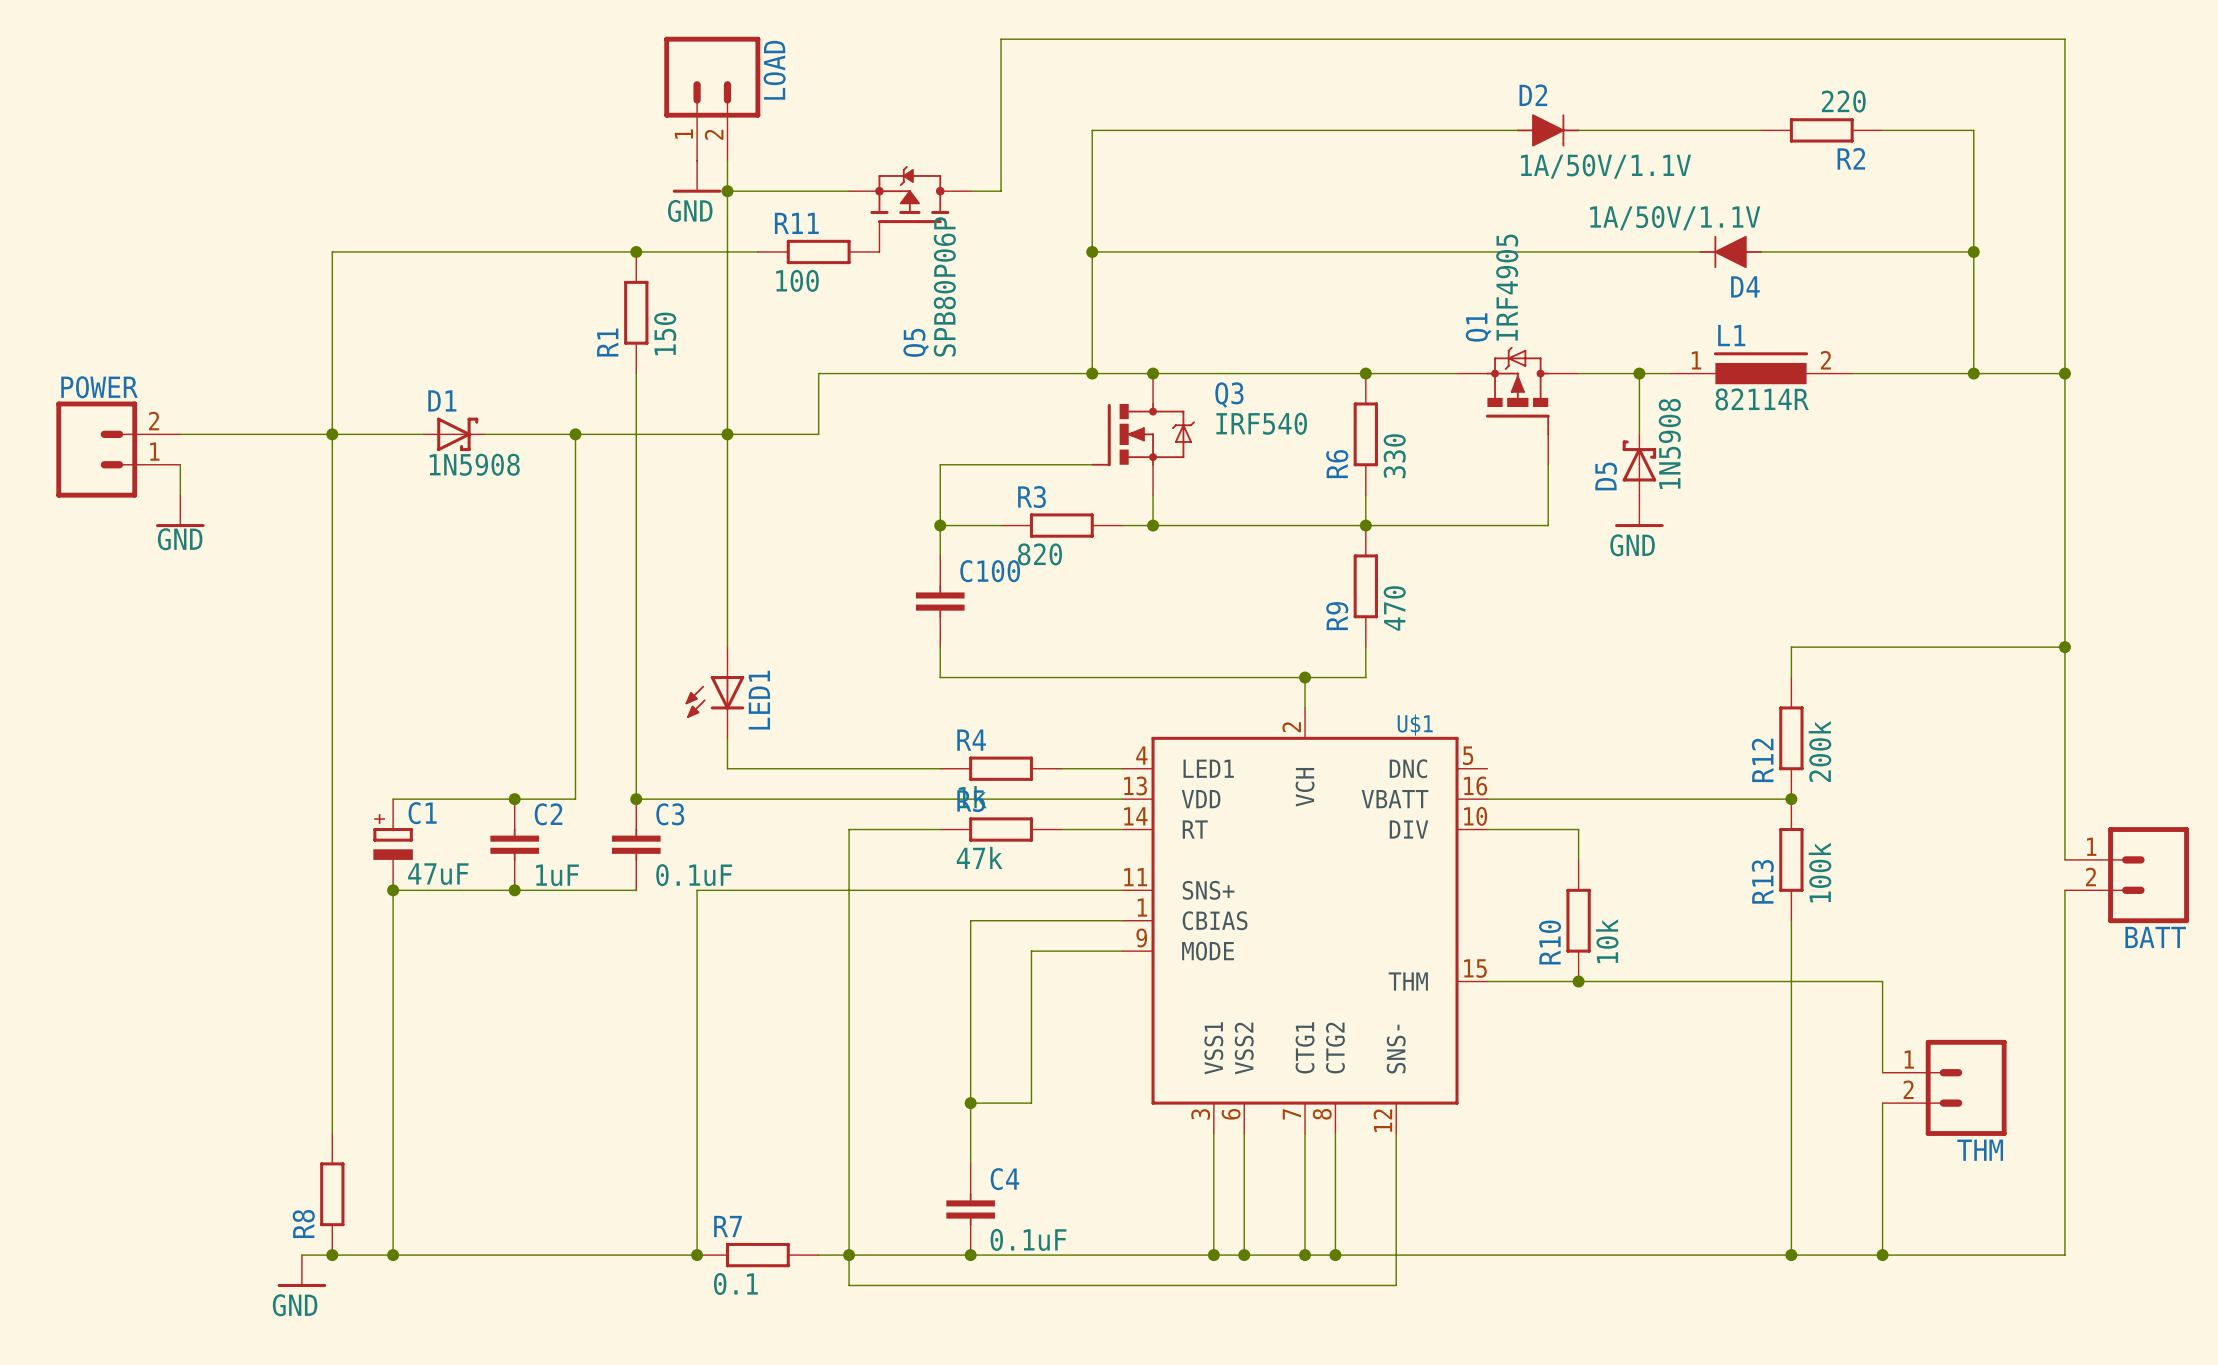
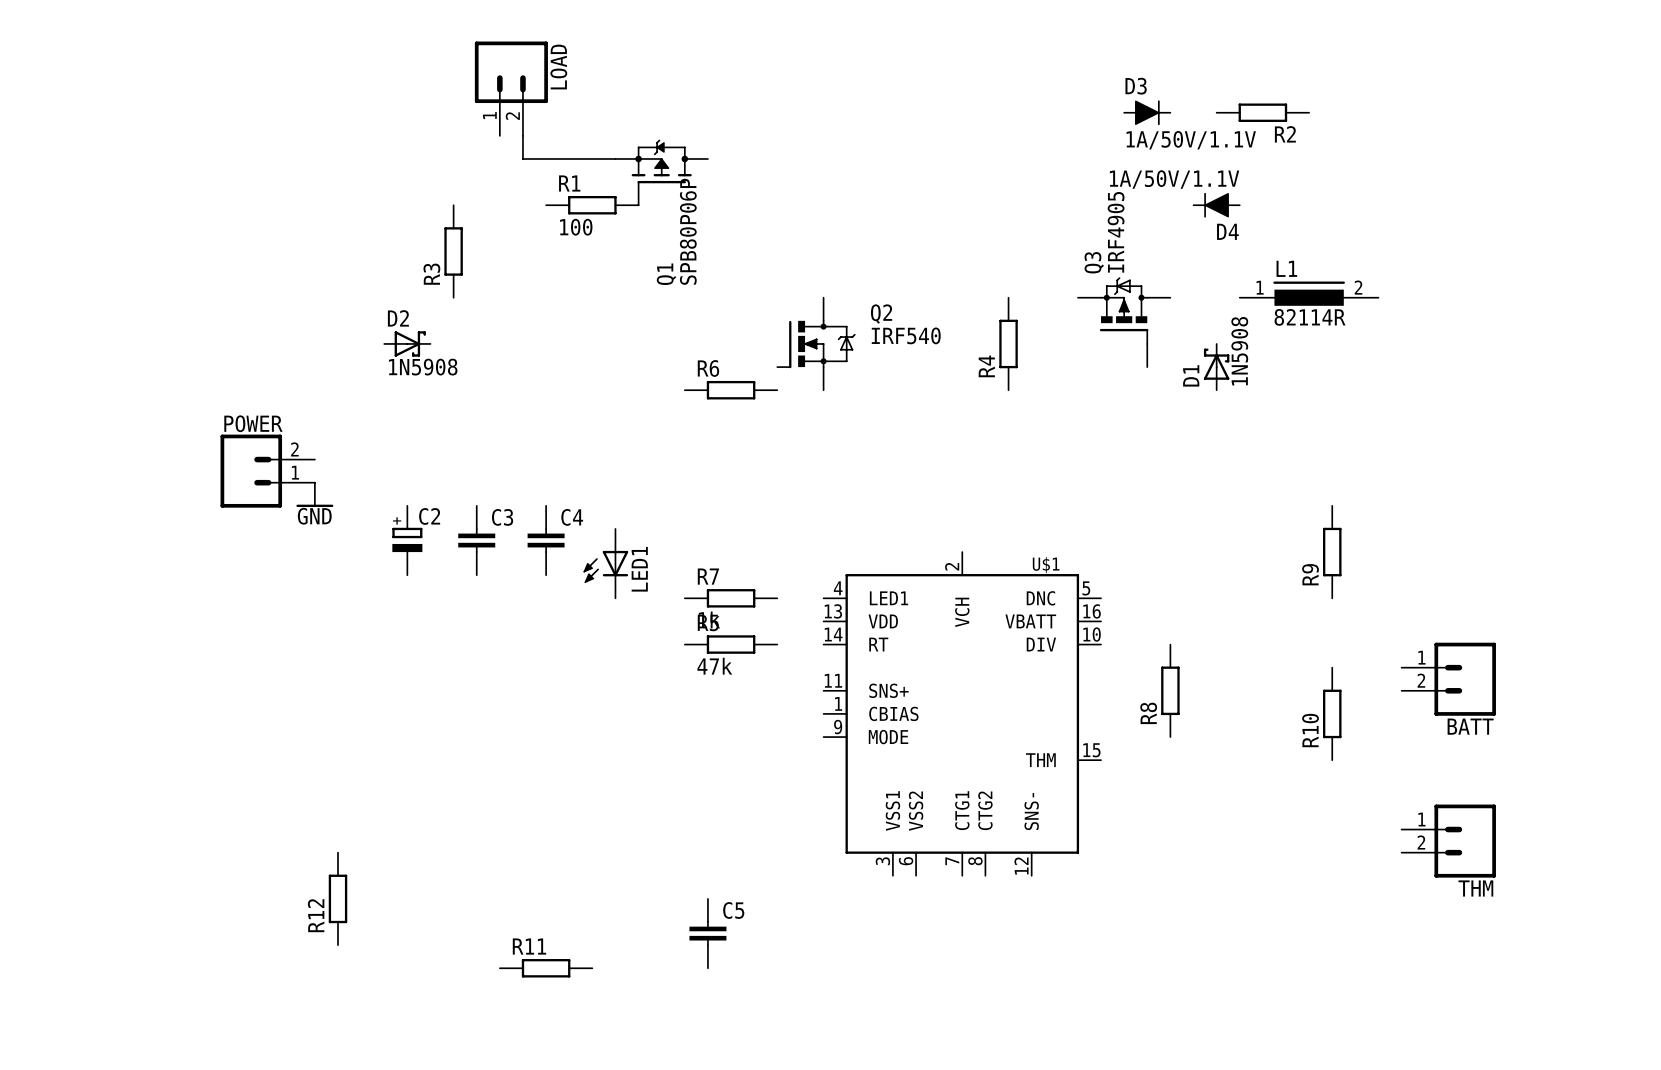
D2 name: D2 (1533, 95) -> D3 (1136, 86)
R2 value: 220 (1843, 101) -> none
wire: (1517, 130) (1092, 130) (1092, 373) -> none
wire: (1578, 130) (1760, 130) -> none
R2 position: (1821, 130) -> (1262, 112)
wire: (1882, 130) (1973, 130) (1973, 373) -> none
power symbol: GND (697, 176) -> none
wire: (727, 191) (727, 647) -> none
junction: (727, 191) -> none
wire: (970, 191) (1001, 191) (1001, 39) (2064, 39) (2064, 859) -> none
R11 name: R11 (796, 223) -> R1 (569, 183)
junction: (636, 251) -> none
wire: (757, 251) (332, 251) (332, 1133) -> none
wire: (1092, 251) (1700, 251) -> none
junction: (1092, 251) -> none
D4 position: (1730, 251) -> (1216, 205)
wire: (1760, 251) (1973, 251) -> none
junction: (1973, 251) -> none
Q1 name: Q1 (1478, 327) -> Q3 (1094, 262)
R1 value: 150 (665, 333) -> none
R1 name: R1 (607, 342) -> R3 (431, 274)
Q5 name: Q5 (916, 342) -> Q1 (666, 274)
wire: (636, 373) (636, 799) (1122, 799) -> none
junction: (1092, 373) -> none
junction: (1153, 373) -> none
junction: (1365, 373) -> none
wire: (1457, 373) (818, 373) (818, 434) (484, 434) -> none
wire: (1578, 373) (1669, 373) -> none
wire: (1639, 373) (1639, 434) -> none
junction: (1639, 373) -> none
wire: (1852, 373) (2064, 373) -> none
junction: (1973, 373) -> none
junction: (2064, 373) -> none
wire: (180, 434) (423, 434) -> none
junction: (332, 434) -> none
D1: 1N5908 (453, 434) -> none
wire: (575, 434) (575, 799) (393, 799) -> none
D2: none -> 1N5908 (407, 343)
junction: (575, 434) -> none
junction: (727, 434) -> none
Q2: none -> IRF540 (816, 343)
Q3: IRF540 (1143, 434) -> none
POWER: (118, 449) -> none
R6 value: 330 (1394, 456) -> none
wire: (180, 464) (180, 495) -> none
wire: (1092, 464) (940, 464) (940, 555) -> none
R6 name: R6 (1337, 464) -> R4 (986, 366)
wire: (1548, 464) (1548, 525) (1122, 525) -> none
D5 name: D5 (1606, 476) -> D1 (1191, 375)
R6: none -> (731, 390)
wire: (1153, 495) (1153, 525) -> none
wire: (1365, 495) (1365, 525) -> none
power symbol: GND (180, 511) -> none
power symbol: GND (1639, 511) -> none
wire: (940, 525) (1001, 525) -> none
junction: (940, 525) -> none
R3: 820 (1061, 525) -> none
junction: (1153, 525) -> none
junction: (1365, 525) -> none
R9 position: (1365, 586) -> (1332, 552)
POWER: none -> (267, 471)
C100: (940, 601) -> none
R9 value: 470 (1394, 608) -> none
power symbol: none -> GND (314, 494)
wire: (940, 647) (940, 677) (1365, 677) (1365, 647) -> none
wire: (2064, 647) (1791, 647) (1791, 677) -> none
junction: (2064, 647) -> none
wire: (1305, 677) (1305, 707) -> none
junction: (1305, 677) -> none
LED1 position: (714, 692) -> (605, 563)
C4: none -> (546, 540)
wire: (727, 738) (727, 768) (940, 768) -> none
R12 position: (1791, 738) -> (338, 898)
R4 name: R4 (971, 740) -> R7 (708, 576)
R12 value: 200k (1820, 751) -> none
wire: (1061, 768) (1122, 768) -> none
C2 symbol: [490, 799, 540, 891] -> [392, 505, 423, 576]
junction: (514, 799) -> none
junction: (636, 799) -> none
wire: (1487, 799) (1791, 799) -> none
junction: (1791, 799) -> none
wire: (940, 829) (849, 829) (849, 1285) (1396, 1285) (1396, 1133) -> none
wire: (1061, 829) (1122, 829) -> none
wire: (1487, 829) (1578, 829) (1578, 859) -> none
C1: 47uF (393, 844) -> none
C3 position: (636, 844) -> (476, 540)
R13: 100k (1791, 859) -> none
C2 value: 1uF (557, 875) -> none
C3 value: 0.1uF (694, 875) -> none
BATT position: (2126, 875) -> (1448, 679)
junction: (393, 890) -> none
junction: (514, 890) -> none
wire: (636, 890) (393, 890) (393, 1255) -> none
wire: (1122, 890) (697, 890) (697, 1255) (301, 1255) -> none
wire: (2064, 890) (2064, 1255) (818, 1255) -> none
wire: (1122, 920) (970, 920) (970, 1163) -> none
R10 position: (1578, 920) -> (1332, 713)
wire: (1791, 920) (1791, 1255) -> none
R10 value: 10k (1607, 941) -> none
wire: (1122, 951) (1031, 951) (1031, 1103) (970, 1103) -> none
wire: (1487, 981) (1882, 981) (1882, 1072) -> none
junction: (1578, 981) -> none
junction: (970, 1103) -> none
wire: (1882, 1103) (1882, 1255) -> none
wire: (1213, 1133) (1213, 1255) -> none
wire: (1244, 1133) (1244, 1255) -> none
wire: (1305, 1133) (1305, 1255) -> none
wire: (1335, 1133) (1335, 1255) -> none
C4 name: C4 (1004, 1179) -> C5 (733, 910)
R8 position: (332, 1194) -> (1170, 690)
R7 name: R7 (728, 1226) -> R11 (529, 946)
C4 value: 0.1uF (1028, 1239) -> none
junction: (332, 1255) -> none
junction: (393, 1255) -> none
junction: (697, 1255) -> none
junction: (849, 1255) -> none
junction: (970, 1255) -> none
junction: (1213, 1255) -> none
junction: (1244, 1255) -> none
junction: (1305, 1255) -> none
junction: (1335, 1255) -> none
junction: (1791, 1255) -> none
junction: (1882, 1255) -> none
power symbol: GND (301, 1271) -> none
R7 value: 0.1 (735, 1283) -> none

